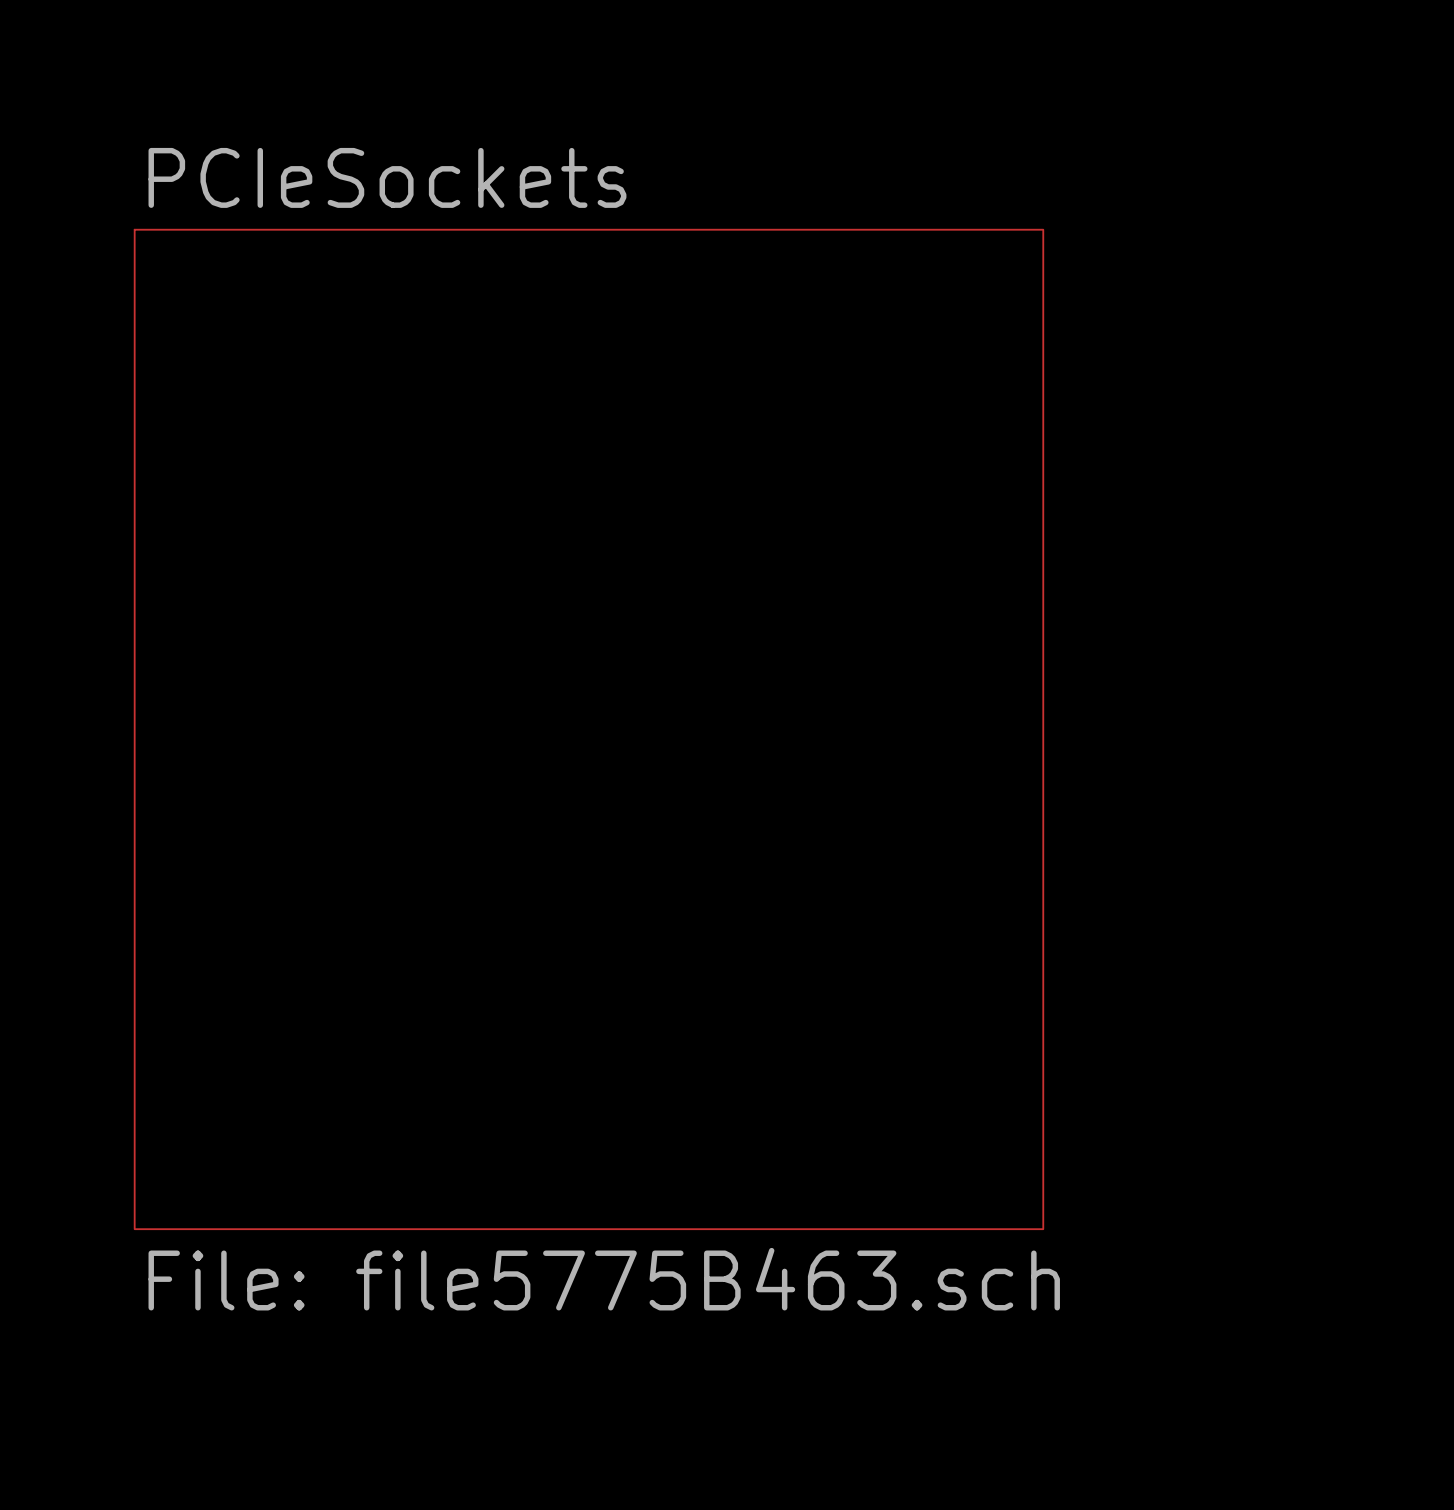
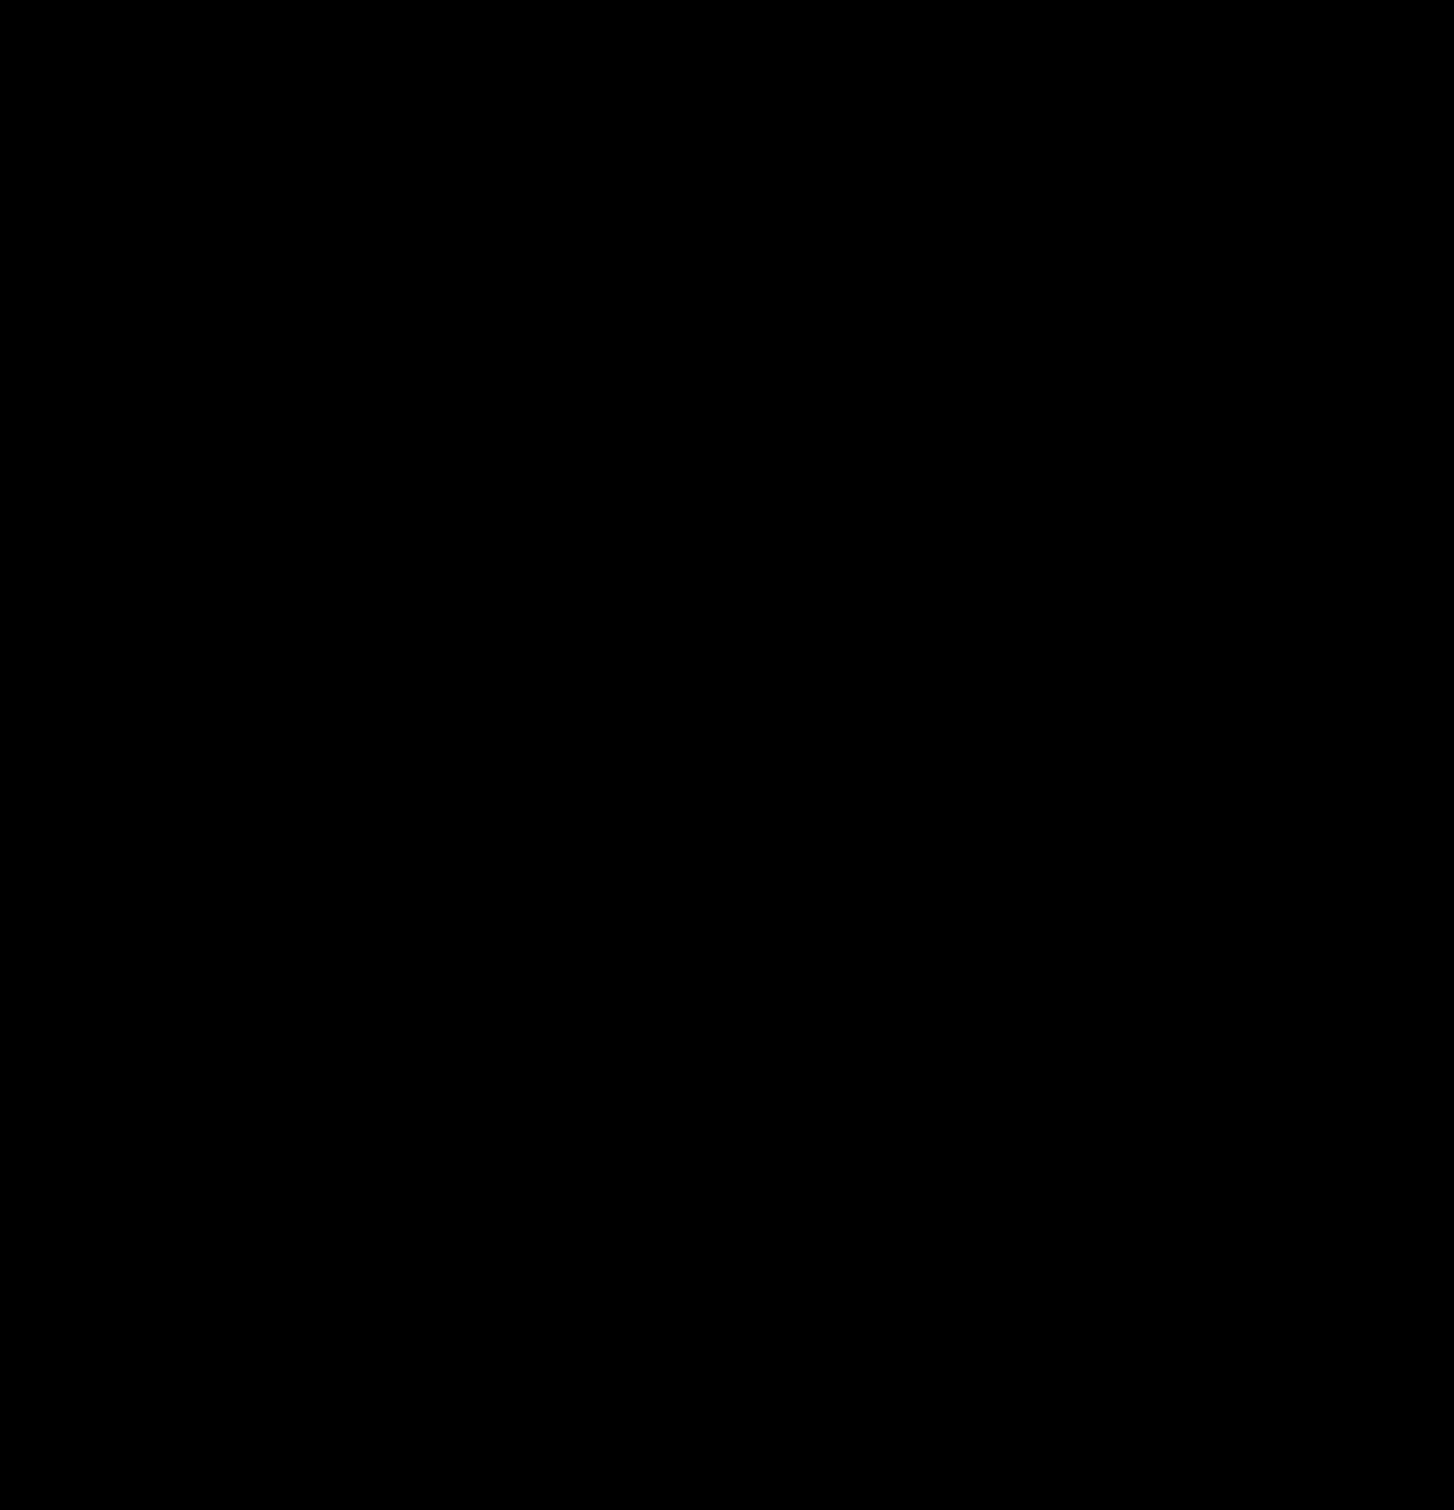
sheet PCIeSockets: File: file5775B463.sch (588, 729) -> none

